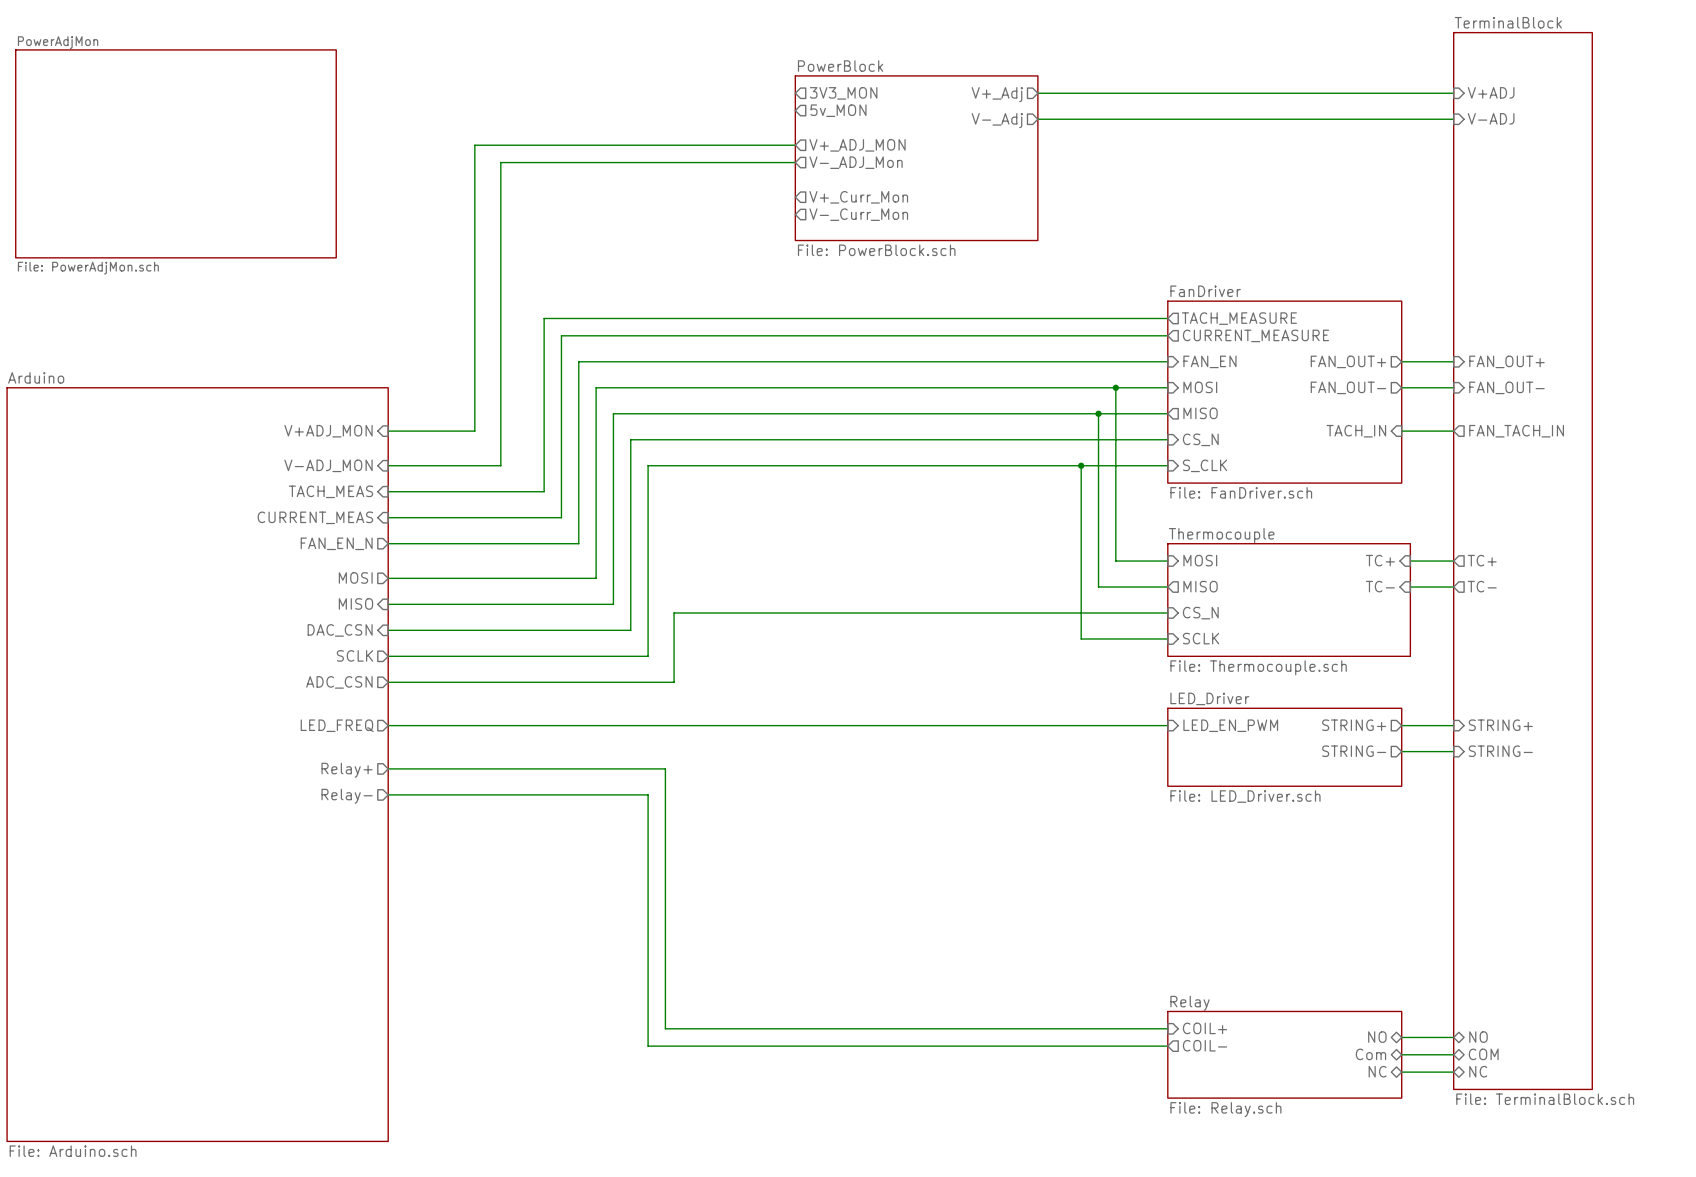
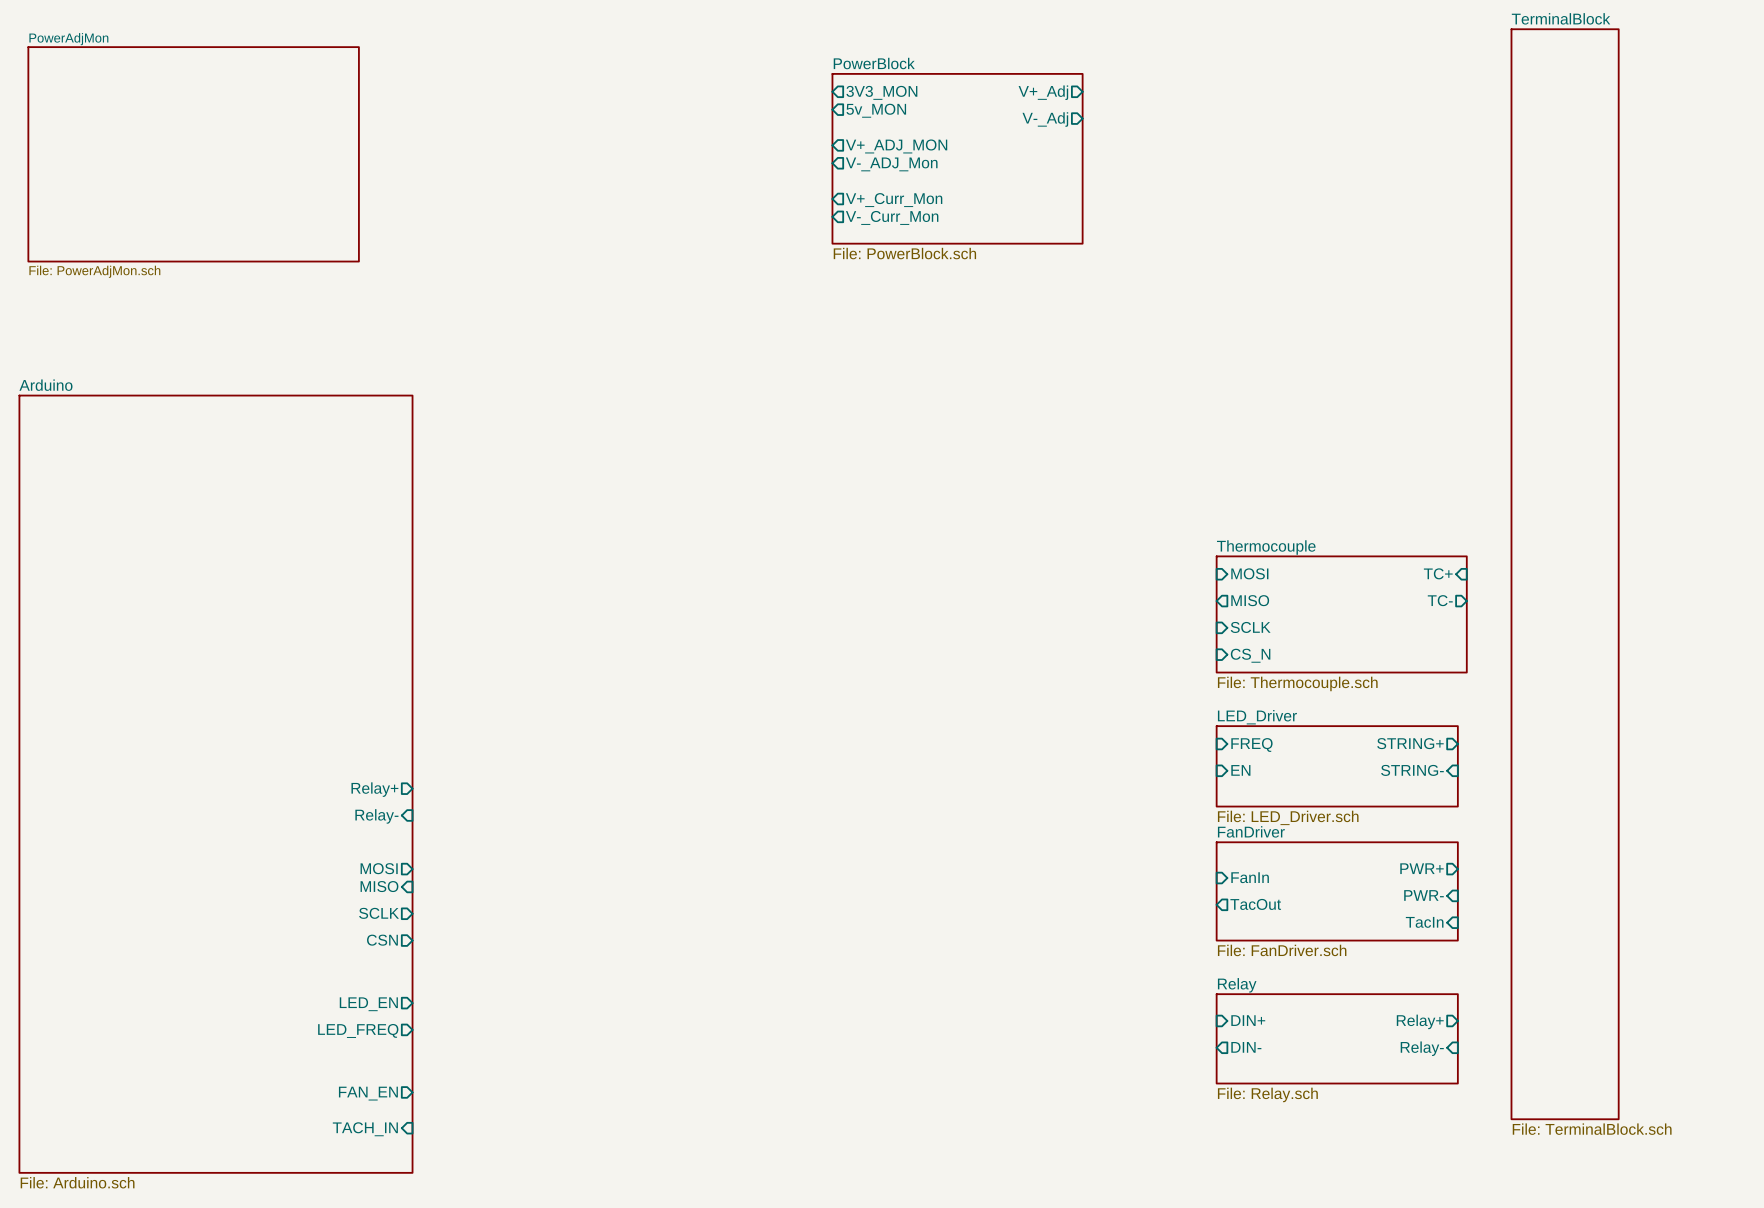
sheet pin: V+ADJ (1491, 92) -> none
wire: (1037, 93) (1453, 93) -> none
sheet pin: V-ADJ (1491, 118) -> none
wire: (1037, 119) (1453, 119) -> none
wire: (795, 145) (474, 145) (474, 431) (388, 431) -> none
wire: (795, 162) (500, 162) (500, 465) (388, 465) -> none
wire: (1167, 318) (544, 318) (544, 491) (388, 491) -> none
sheet pin: TACH_MEASURE (1239, 318) -> none
wire: (1167, 335) (561, 335) (561, 517) (388, 517) -> none
sheet pin: CURRENT_MEASURE (1255, 335) -> none
wire: (1167, 361) (578, 361) (578, 543) (388, 543) -> none
sheet pin: FAN_EN (1209, 361) -> none
sheet pin: FAN_OUT+ (1348, 361) -> none
wire: (1401, 361) (1453, 361) -> none
sheet pin: FAN_OUT+ (1506, 361) -> none
wire: (1115, 387) (1115, 561) (1167, 561) -> none
junction: (1115, 387) -> none
wire: (1167, 387) (596, 387) (596, 578) (388, 578) -> none
sheet pin: MOSI (1200, 387) -> none
sheet pin: FAN_OUT- (1348, 387) -> none
wire: (1401, 387) (1453, 387) -> none
sheet pin: FAN_OUT- (1506, 387) -> none
sheet FanDriver: File: FanDriver.sch (1284, 392) -> none
wire: (1098, 413) (1098, 587) (1167, 587) -> none
junction: (1098, 413) -> none
wire: (1167, 413) (613, 413) (613, 604) (388, 604) -> none
sheet pin: MISO (1200, 413) -> none
sheet pin: V+ADJ_MON (328, 431) -> none
sheet pin: TACH_IN (1356, 431) -> none
wire: (1401, 431) (1453, 431) -> none
sheet pin: FAN_TACH_IN (1516, 431) -> none
wire: (1167, 439) (630, 439) (630, 630) (388, 630) -> none
sheet pin: CS_N (1200, 439) -> none
sheet pin: V-ADJ_MON (328, 465) -> none
wire: (1081, 465) (1081, 638) (1167, 638) -> none
junction: (1081, 465) -> none
wire: (1167, 465) (648, 465) (648, 656) (388, 656) -> none
sheet pin: S_CLK (1205, 465) -> none
sheet pin: TACH_MEAS (330, 491) -> none
sheet pin: CURRENT_MEAS (315, 517) -> none
sheet pin: FAN_EN_N (336, 543) -> none
sheet pin: TC+ (1482, 560) -> none
wire: (1410, 561) (1453, 561) -> none
sheet TerminalBlock: none -> File: TerminalBlock.sch (1565, 574)
sheet TerminalBlock: File: TerminalBlock.sch (1522, 561) -> none
sheet pin: MOSI (355, 577) -> none
sheet pin shape: input (1380, 586) -> output (1440, 600)
sheet pin: TC- (1482, 586) -> none
wire: (1410, 587) (1453, 587) -> none
sheet pin: MISO (355, 603) -> none
wire: (1167, 613) (674, 613) (674, 682) (388, 682) -> none
sheet pin: CS_N (1200, 613) -> SCLK (1250, 627)
sheet pin: DAC_CSN (340, 630) -> none
sheet pin: SCLK (1201, 638) -> CS_N (1250, 655)
sheet pin: SCLK (354, 655) -> none
sheet pin: ADC_CSN (339, 682) -> none
sheet pin: LED_FREQ (337, 725) -> none
wire: (388, 725) (1167, 725) -> none
sheet pin: LED_EN_PWM (1230, 725) -> FREQ (1251, 744)
wire: (1401, 725) (1453, 725) -> none
sheet pin: STRING+ (1500, 725) -> none
sheet pin: none -> EN (1240, 770)
sheet pin shape: output (1354, 751) -> input (1412, 770)
wire: (1401, 751) (1453, 751) -> none
sheet pin: STRING- (1500, 751) -> none
wire: (388, 768) (665, 768) (665, 1028) (1167, 1028) -> none
wire: (388, 794) (648, 794) (648, 1046) (1167, 1046) -> none
sheet pin shape: output (347, 796) -> input (376, 816)
sheet pin: none -> MOSI (379, 868)
sheet pin: none -> PWR+ (1422, 868)
sheet pin: none -> FanIn (1250, 877)
sheet pin: none -> MISO (379, 886)
sheet FanDriver: none -> File: FanDriver.sch (1337, 891)
sheet pin: none -> PWR- (1423, 895)
sheet pin: none -> TacOut (1255, 904)
sheet pin: none -> SCLK (379, 913)
sheet pin: none -> TacIn (1424, 922)
sheet pin: none -> CSN (382, 940)
sheet pin: none -> LED_EN (368, 1004)
sheet pin: none -> DIN+ (1248, 1020)
sheet pin: none -> Relay+ (1420, 1021)
sheet pin: none -> LED_FREQ (358, 1030)
sheet pin: none -> DIN- (1246, 1047)
sheet pin: none -> Relay- (1422, 1048)
sheet pin: COIL+ (1205, 1028) -> none
sheet pin: NO (1377, 1037) -> none
wire: (1401, 1037) (1453, 1037) -> none
sheet pin: NO (1478, 1037) -> none
sheet pin: COIL- (1205, 1045) -> none
sheet Relay position: (1284, 1054) -> (1337, 1038)
sheet pin: Com (1370, 1054) -> none
wire: (1401, 1054) (1453, 1054) -> none
sheet pin: COM (1483, 1054) -> none
sheet pin: none -> FAN_EN (368, 1093)
sheet pin: NC (1377, 1071) -> none
sheet pin: NC (1478, 1071) -> none
wire: (1401, 1072) (1453, 1072) -> none
sheet pin: none -> TACH_IN (365, 1129)

